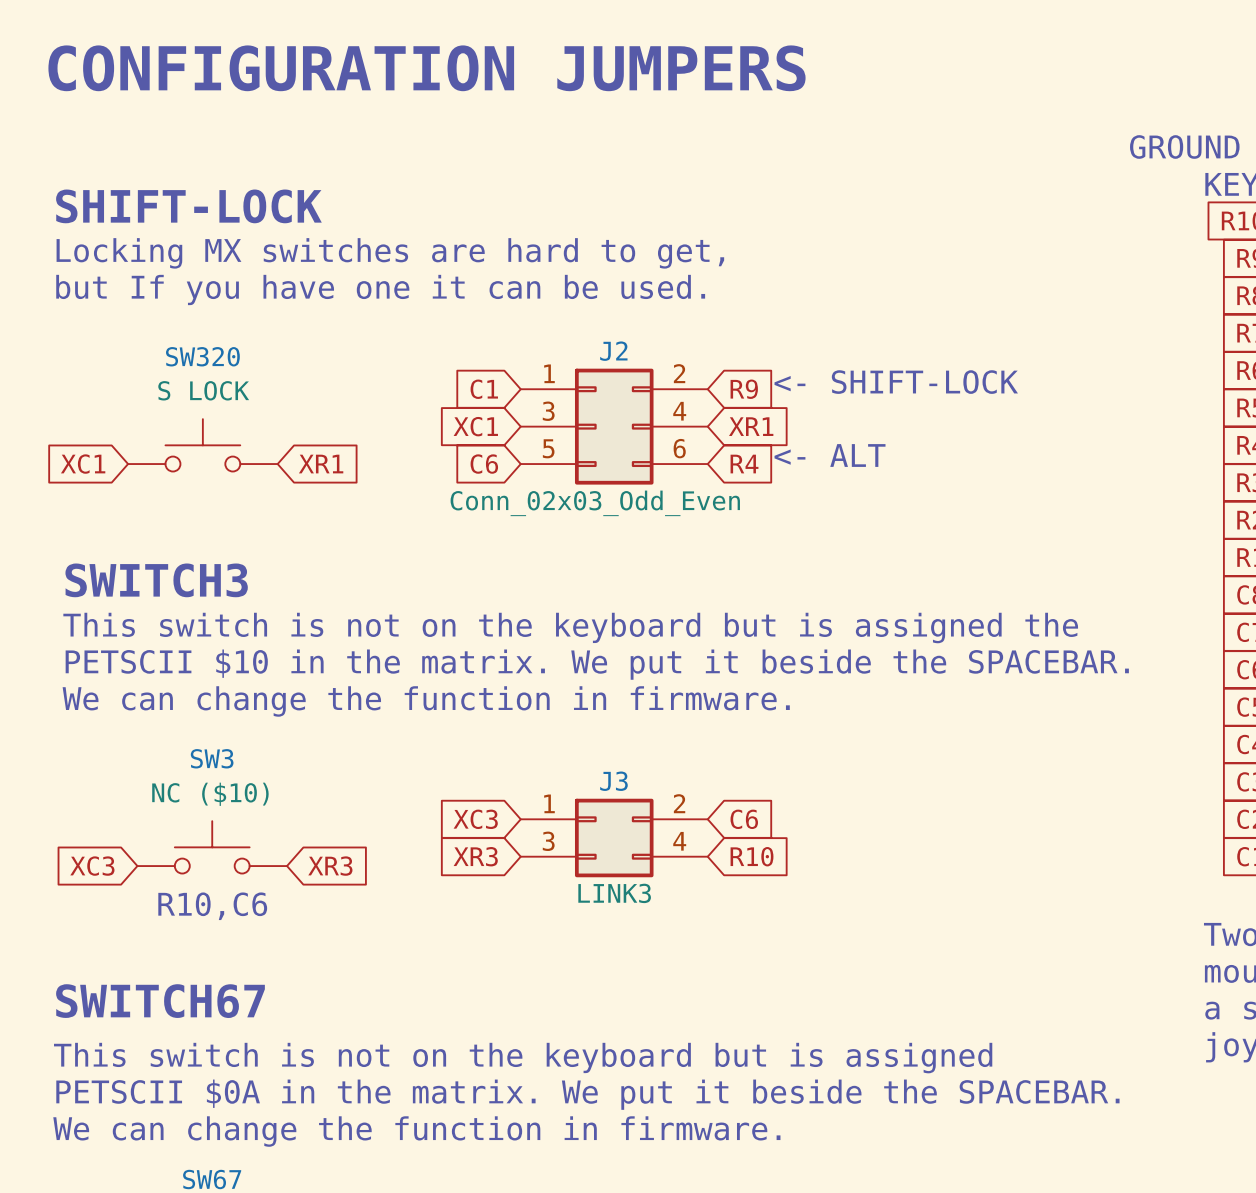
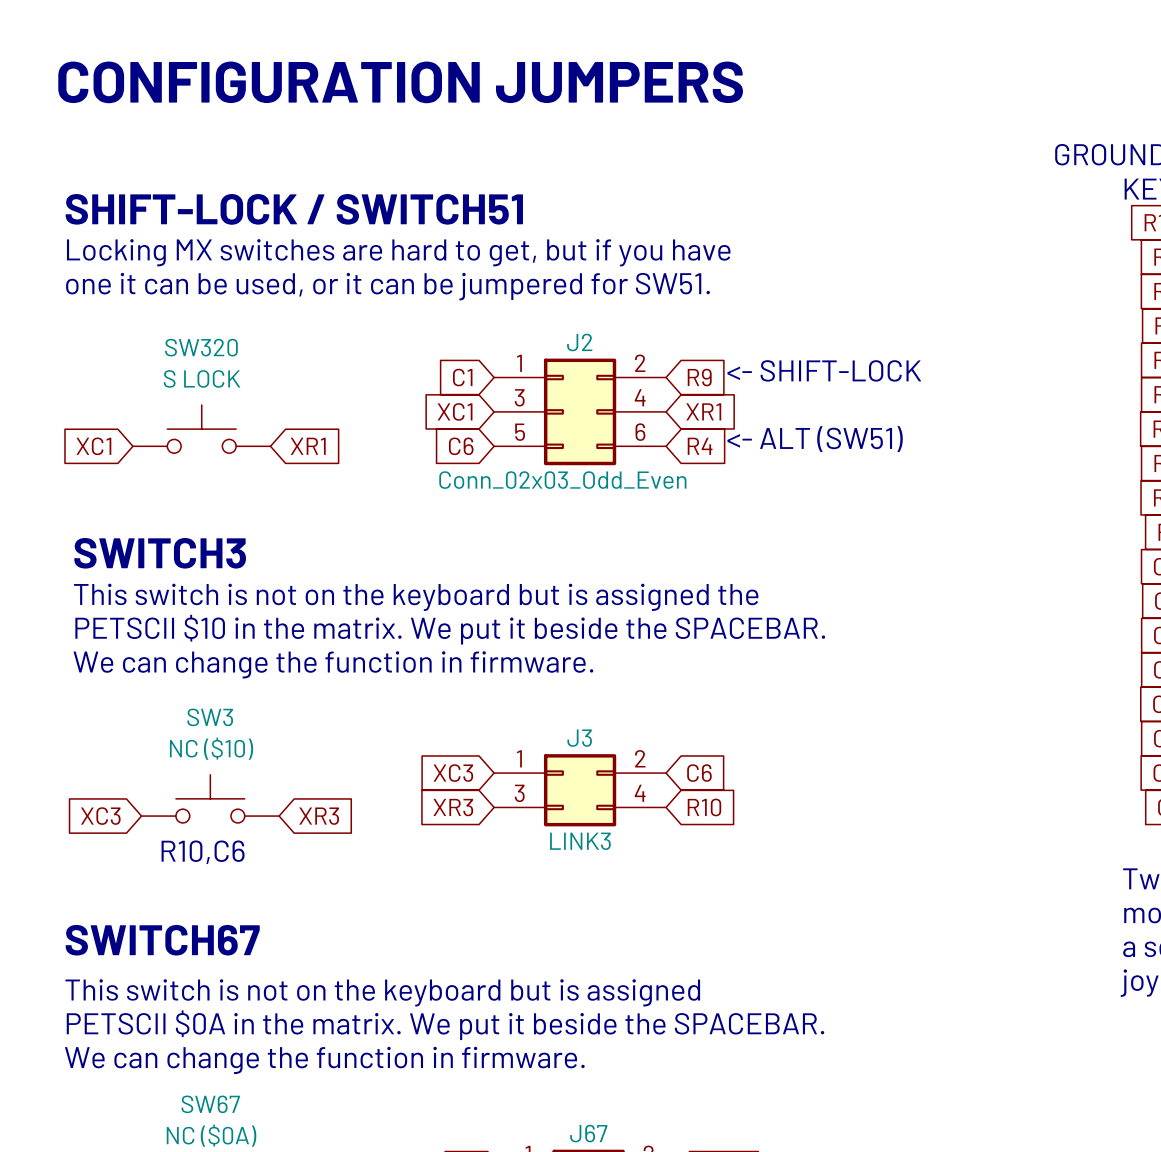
text: SHIFT-LOCK (188, 206) -> SHIFT-LOCK / SWITCH51 (294, 209)
text: Locking MX switches are hard to get, (390, 253) -> Locking MX switches are hard to get, but if you have (398, 252)
text: but If you have one it can be used. (380, 289) -> one it can be used, or it can be jumpered for SW51. (387, 286)
text: <- ALT (830, 455) -> <- ALT (SW51) (815, 439)

